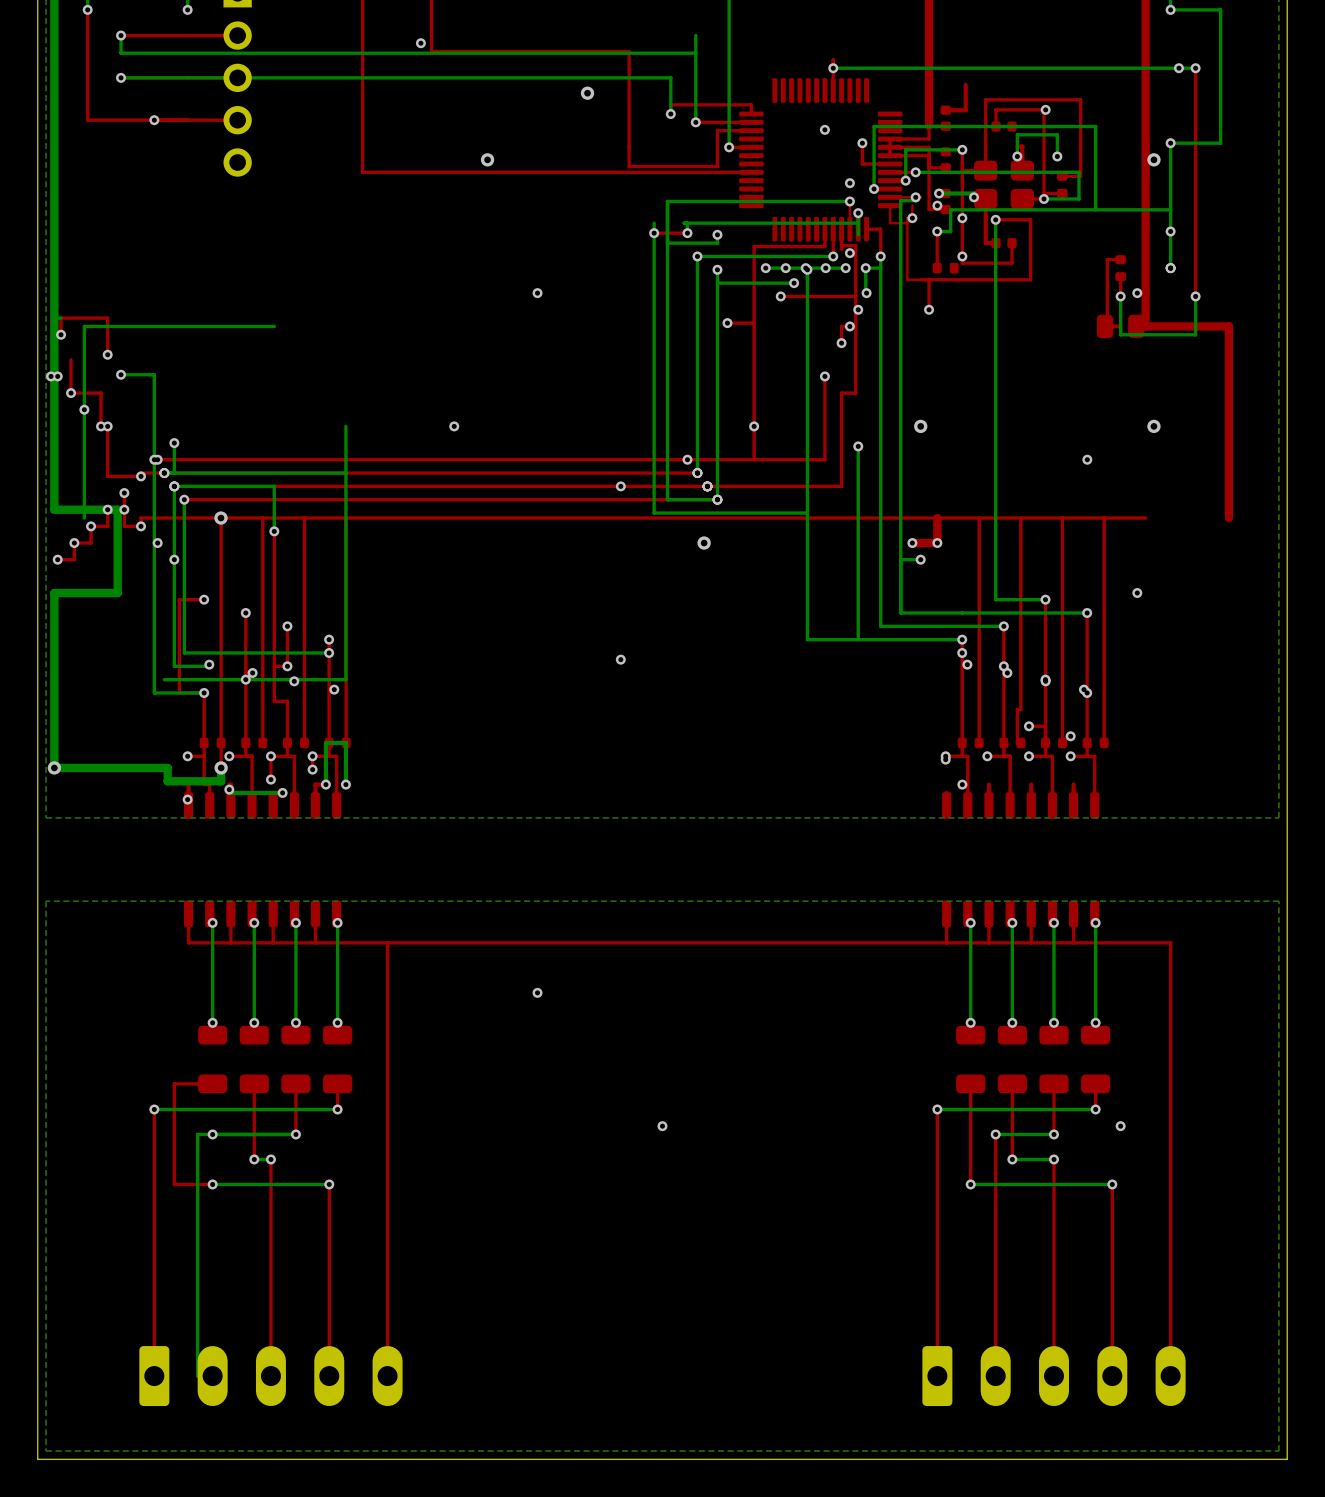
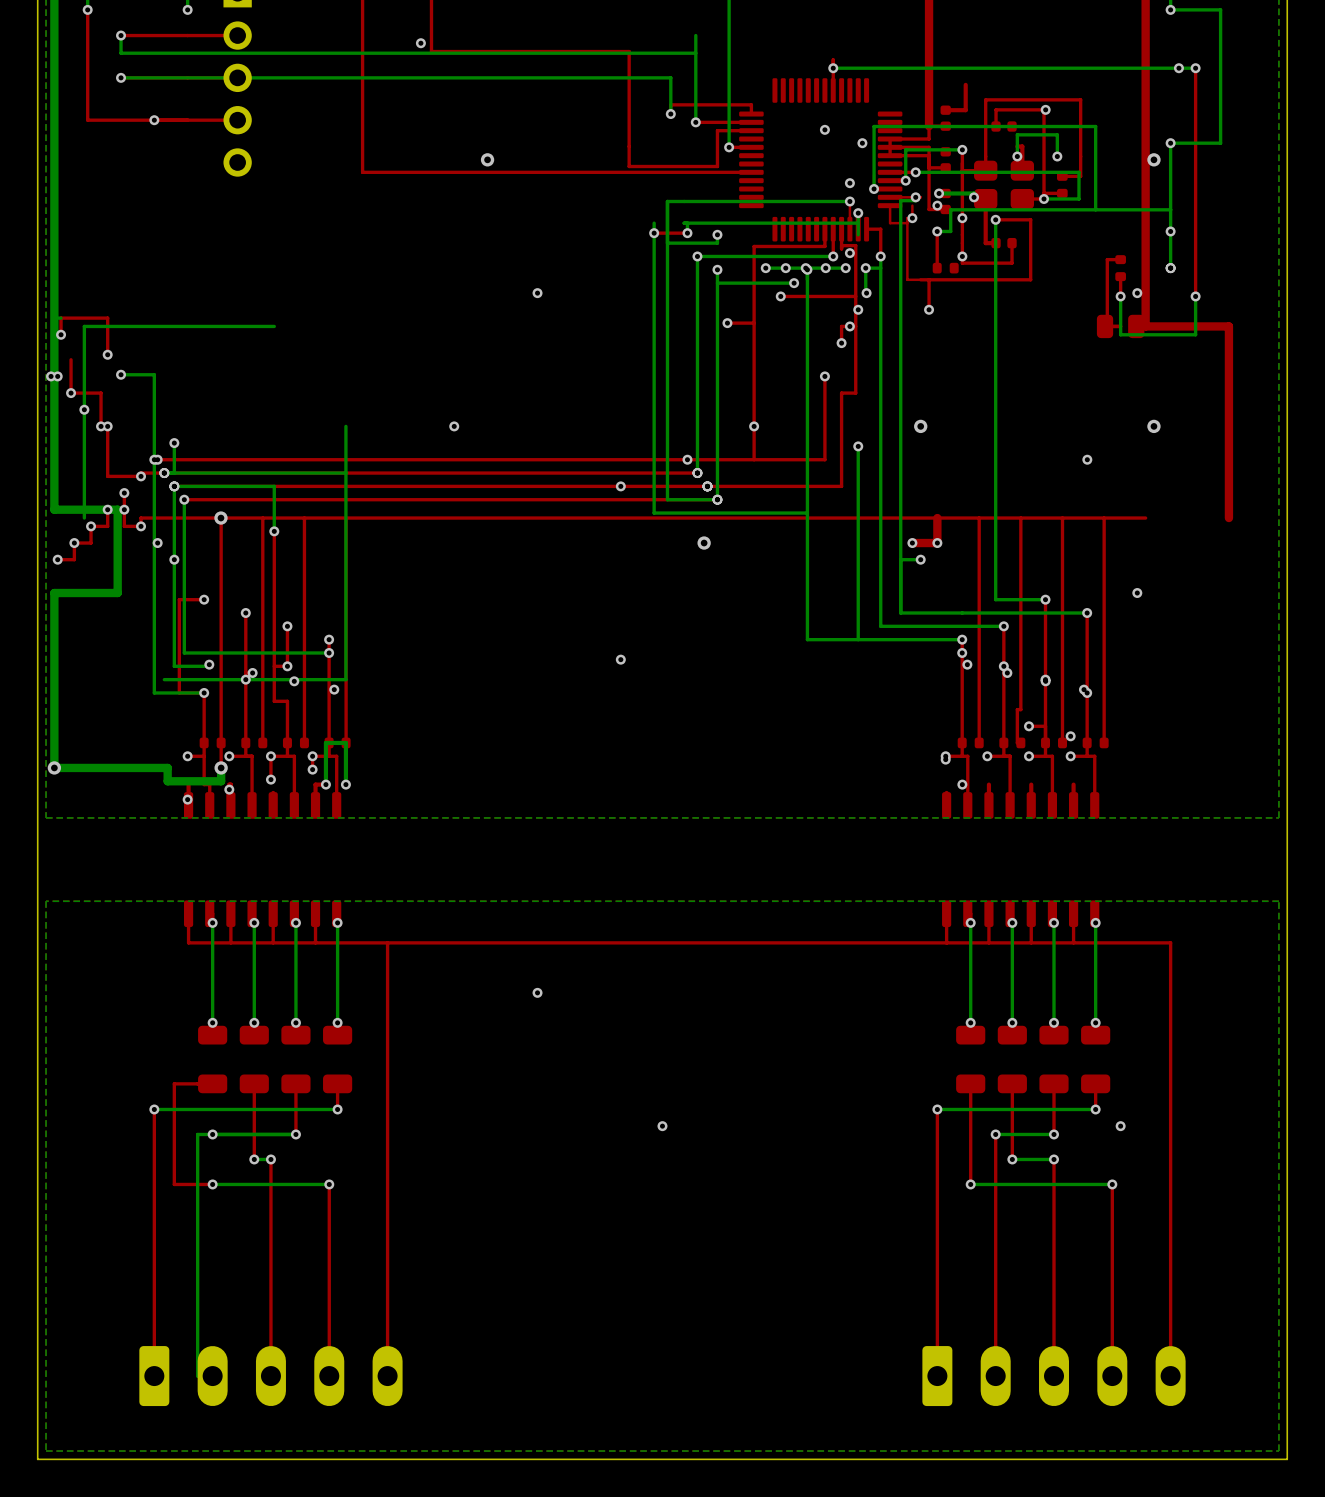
via: (587, 93) -> none
top track: (862, 143) (862, 164) (890, 164) -> none
bottom track: (229, 789) (229, 792) (282, 792) -> none
via: (282, 792) -> none

